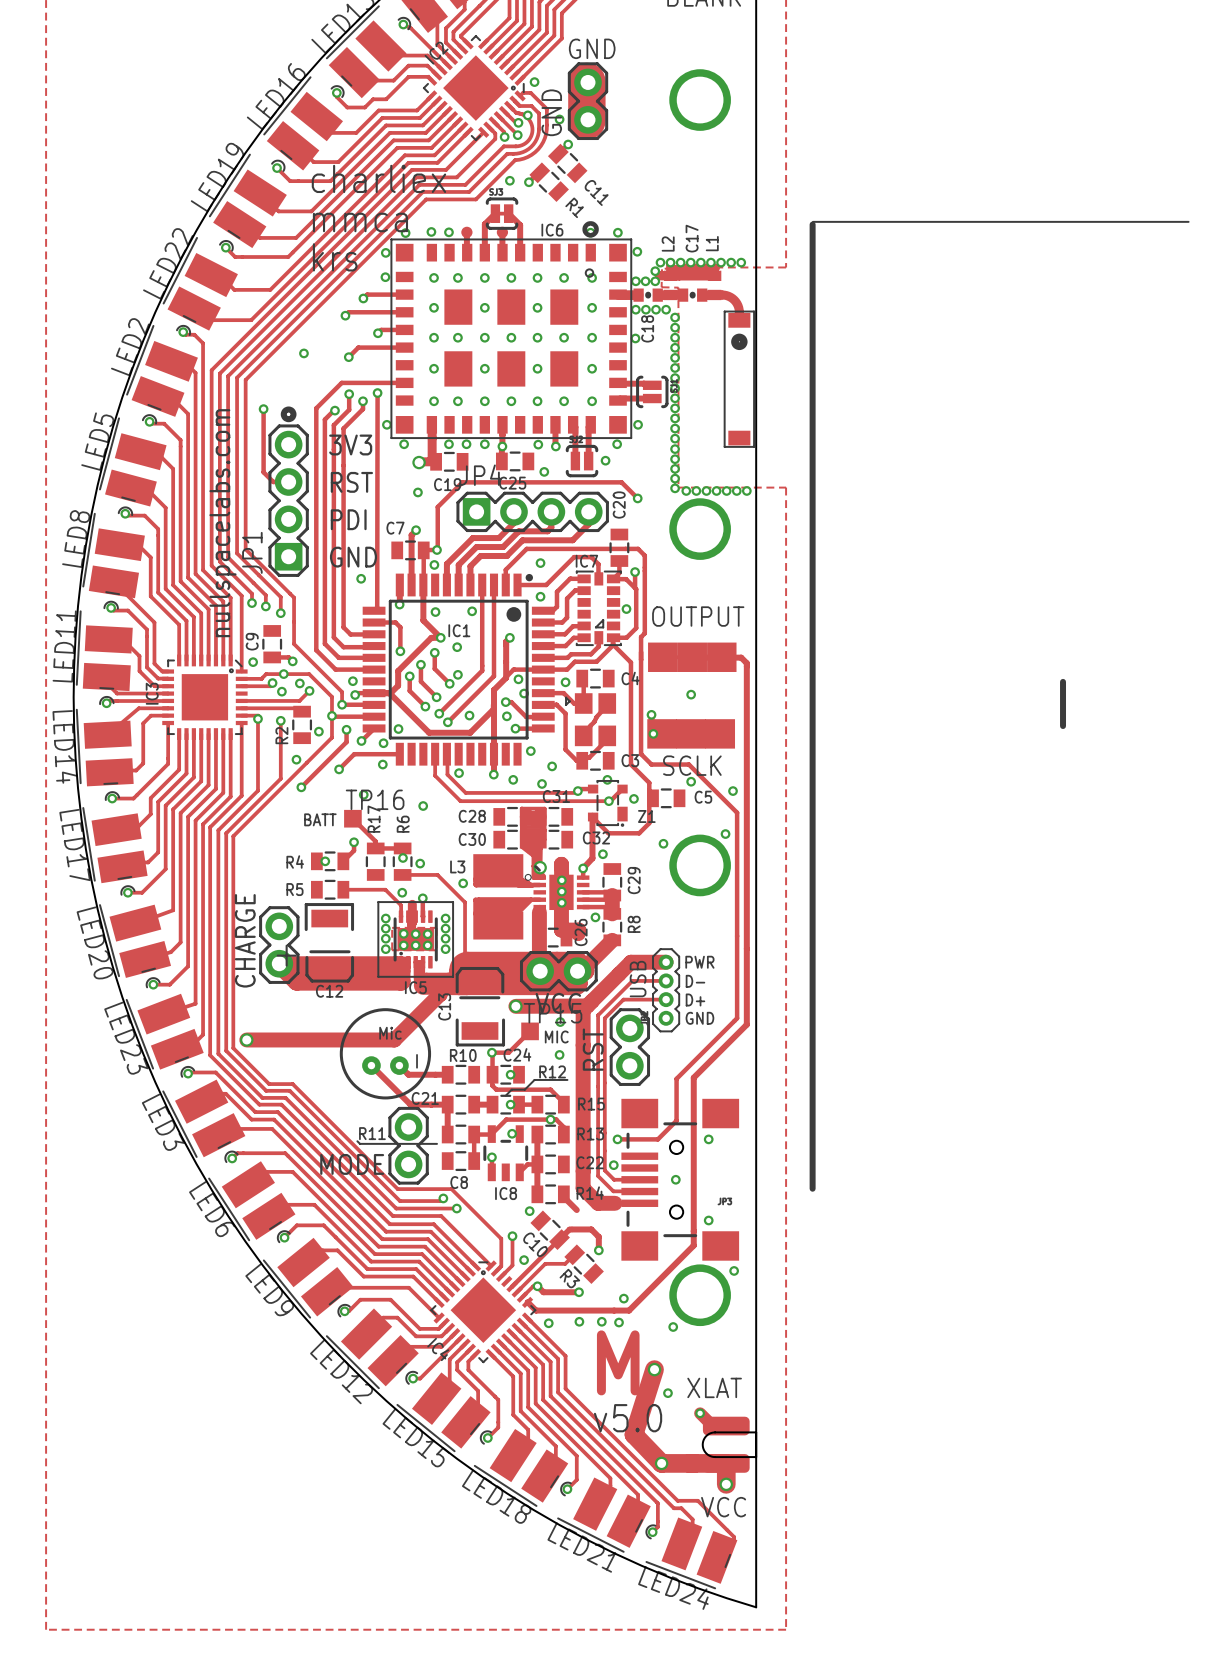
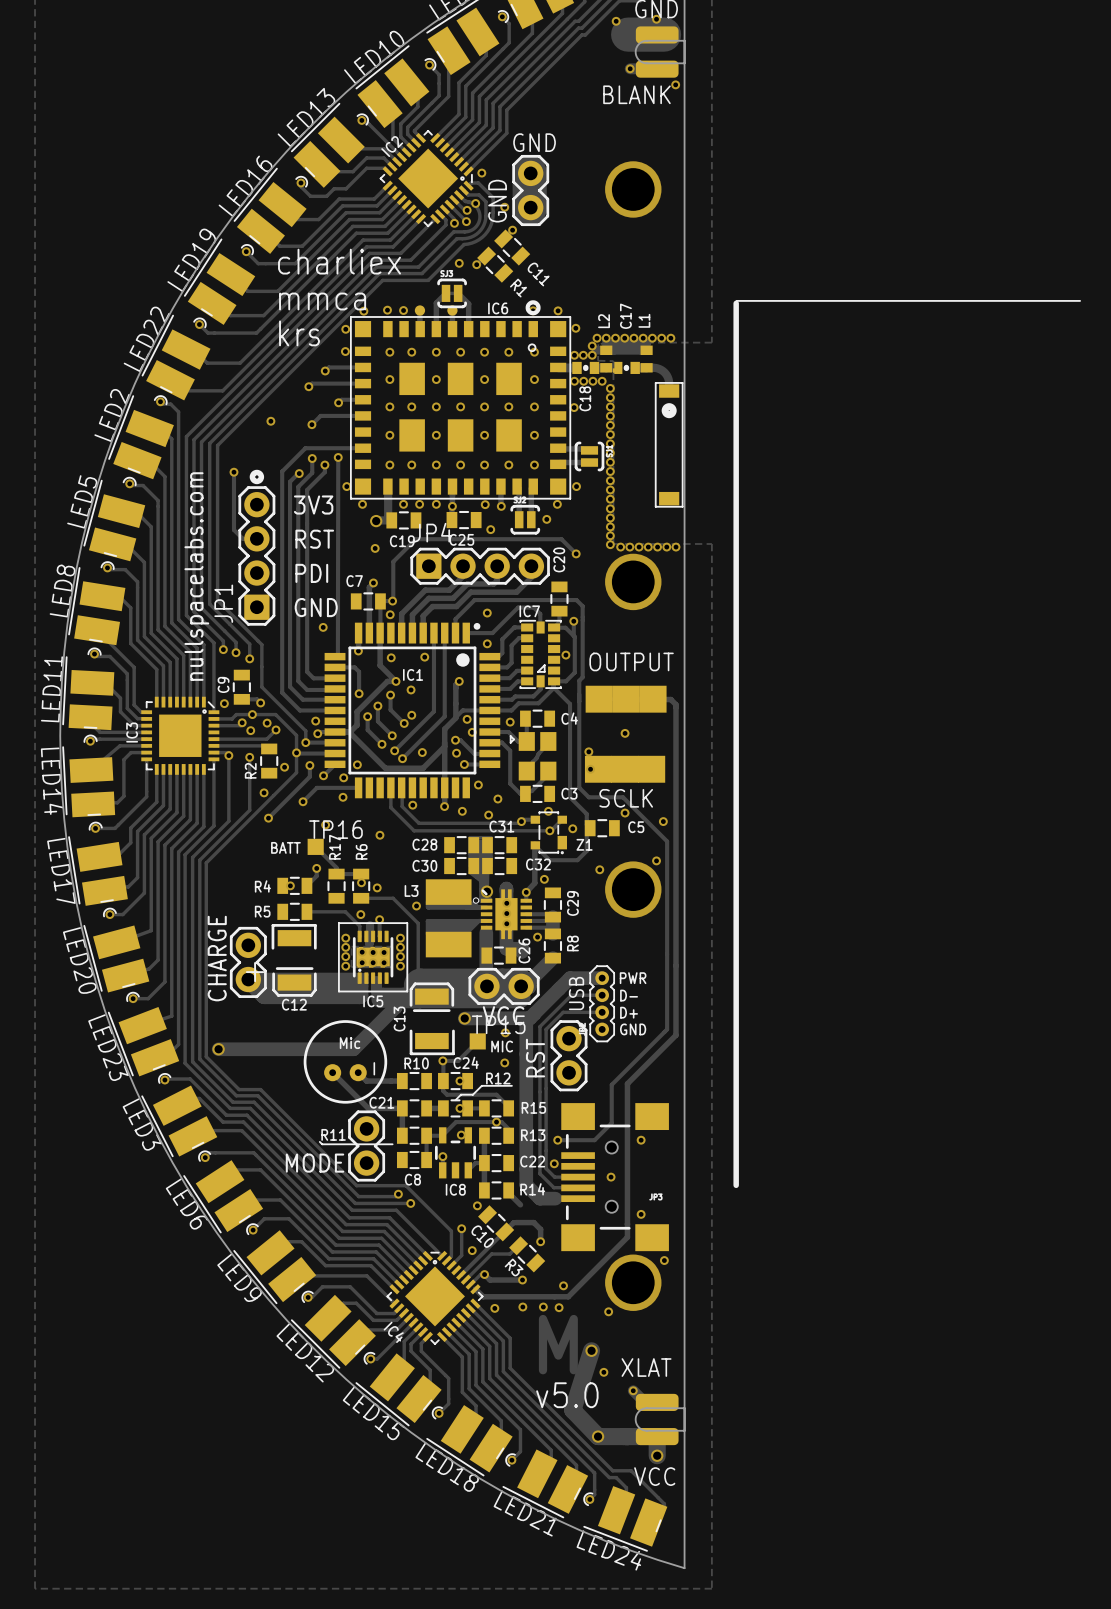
line: (1063, 681) (1063, 726) -> none

